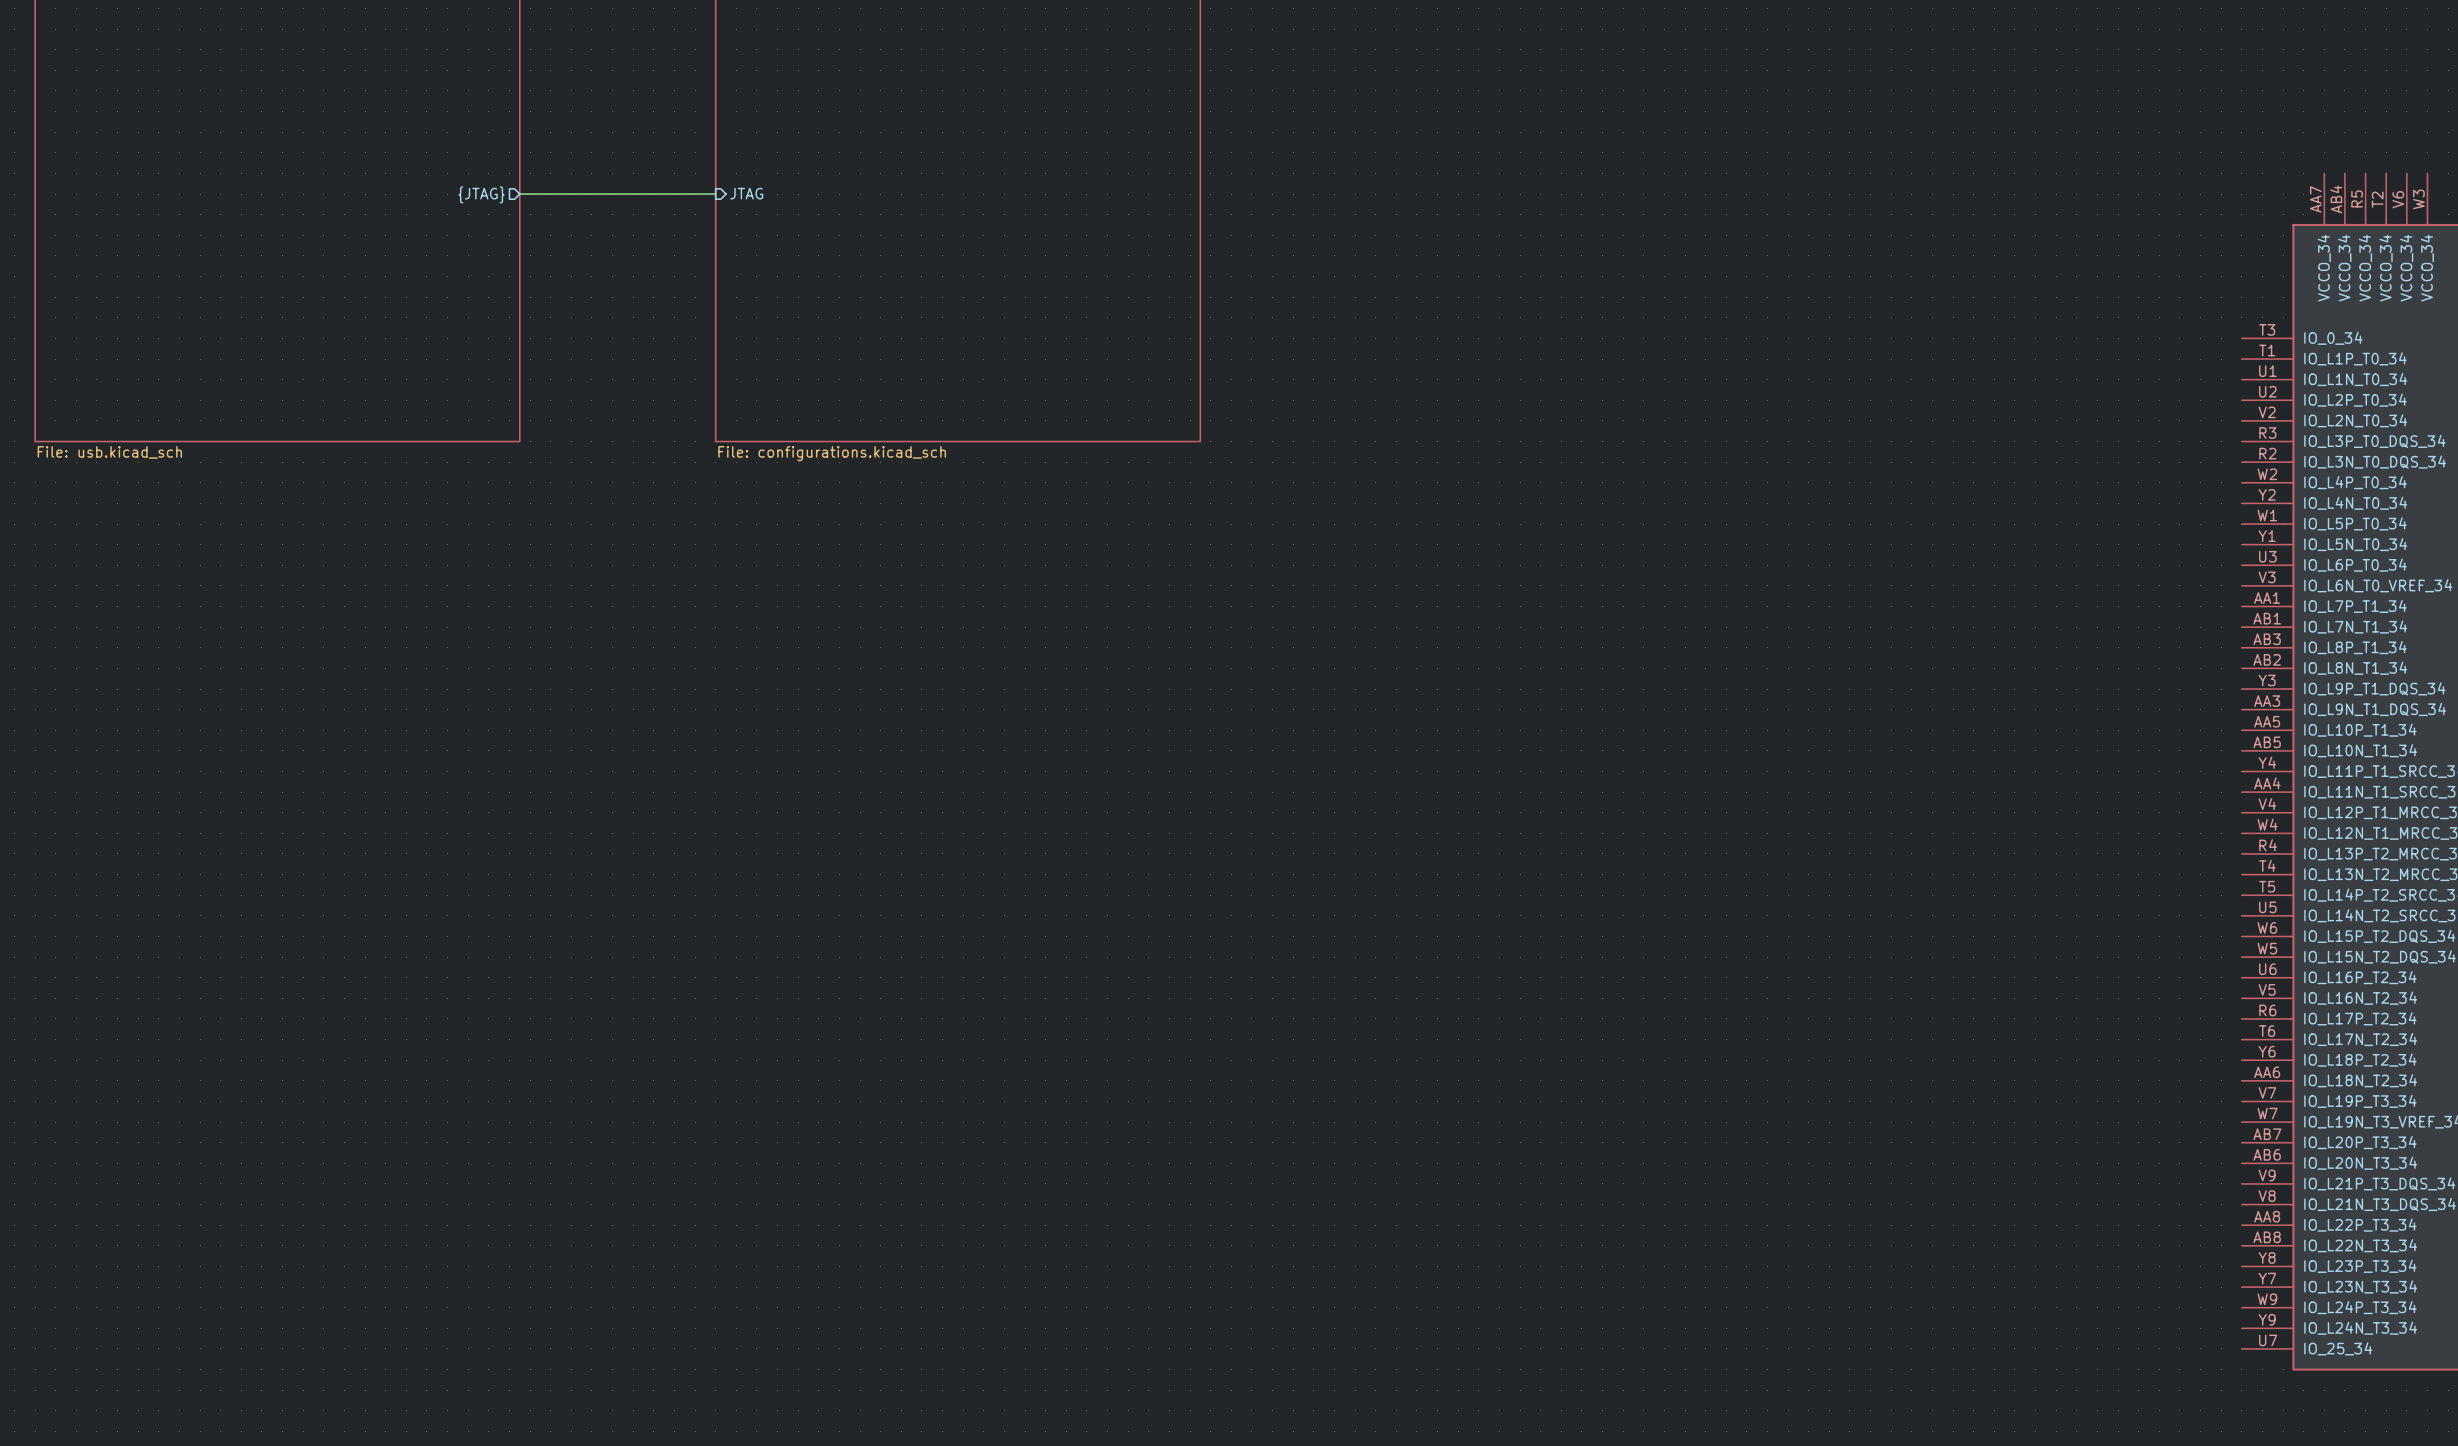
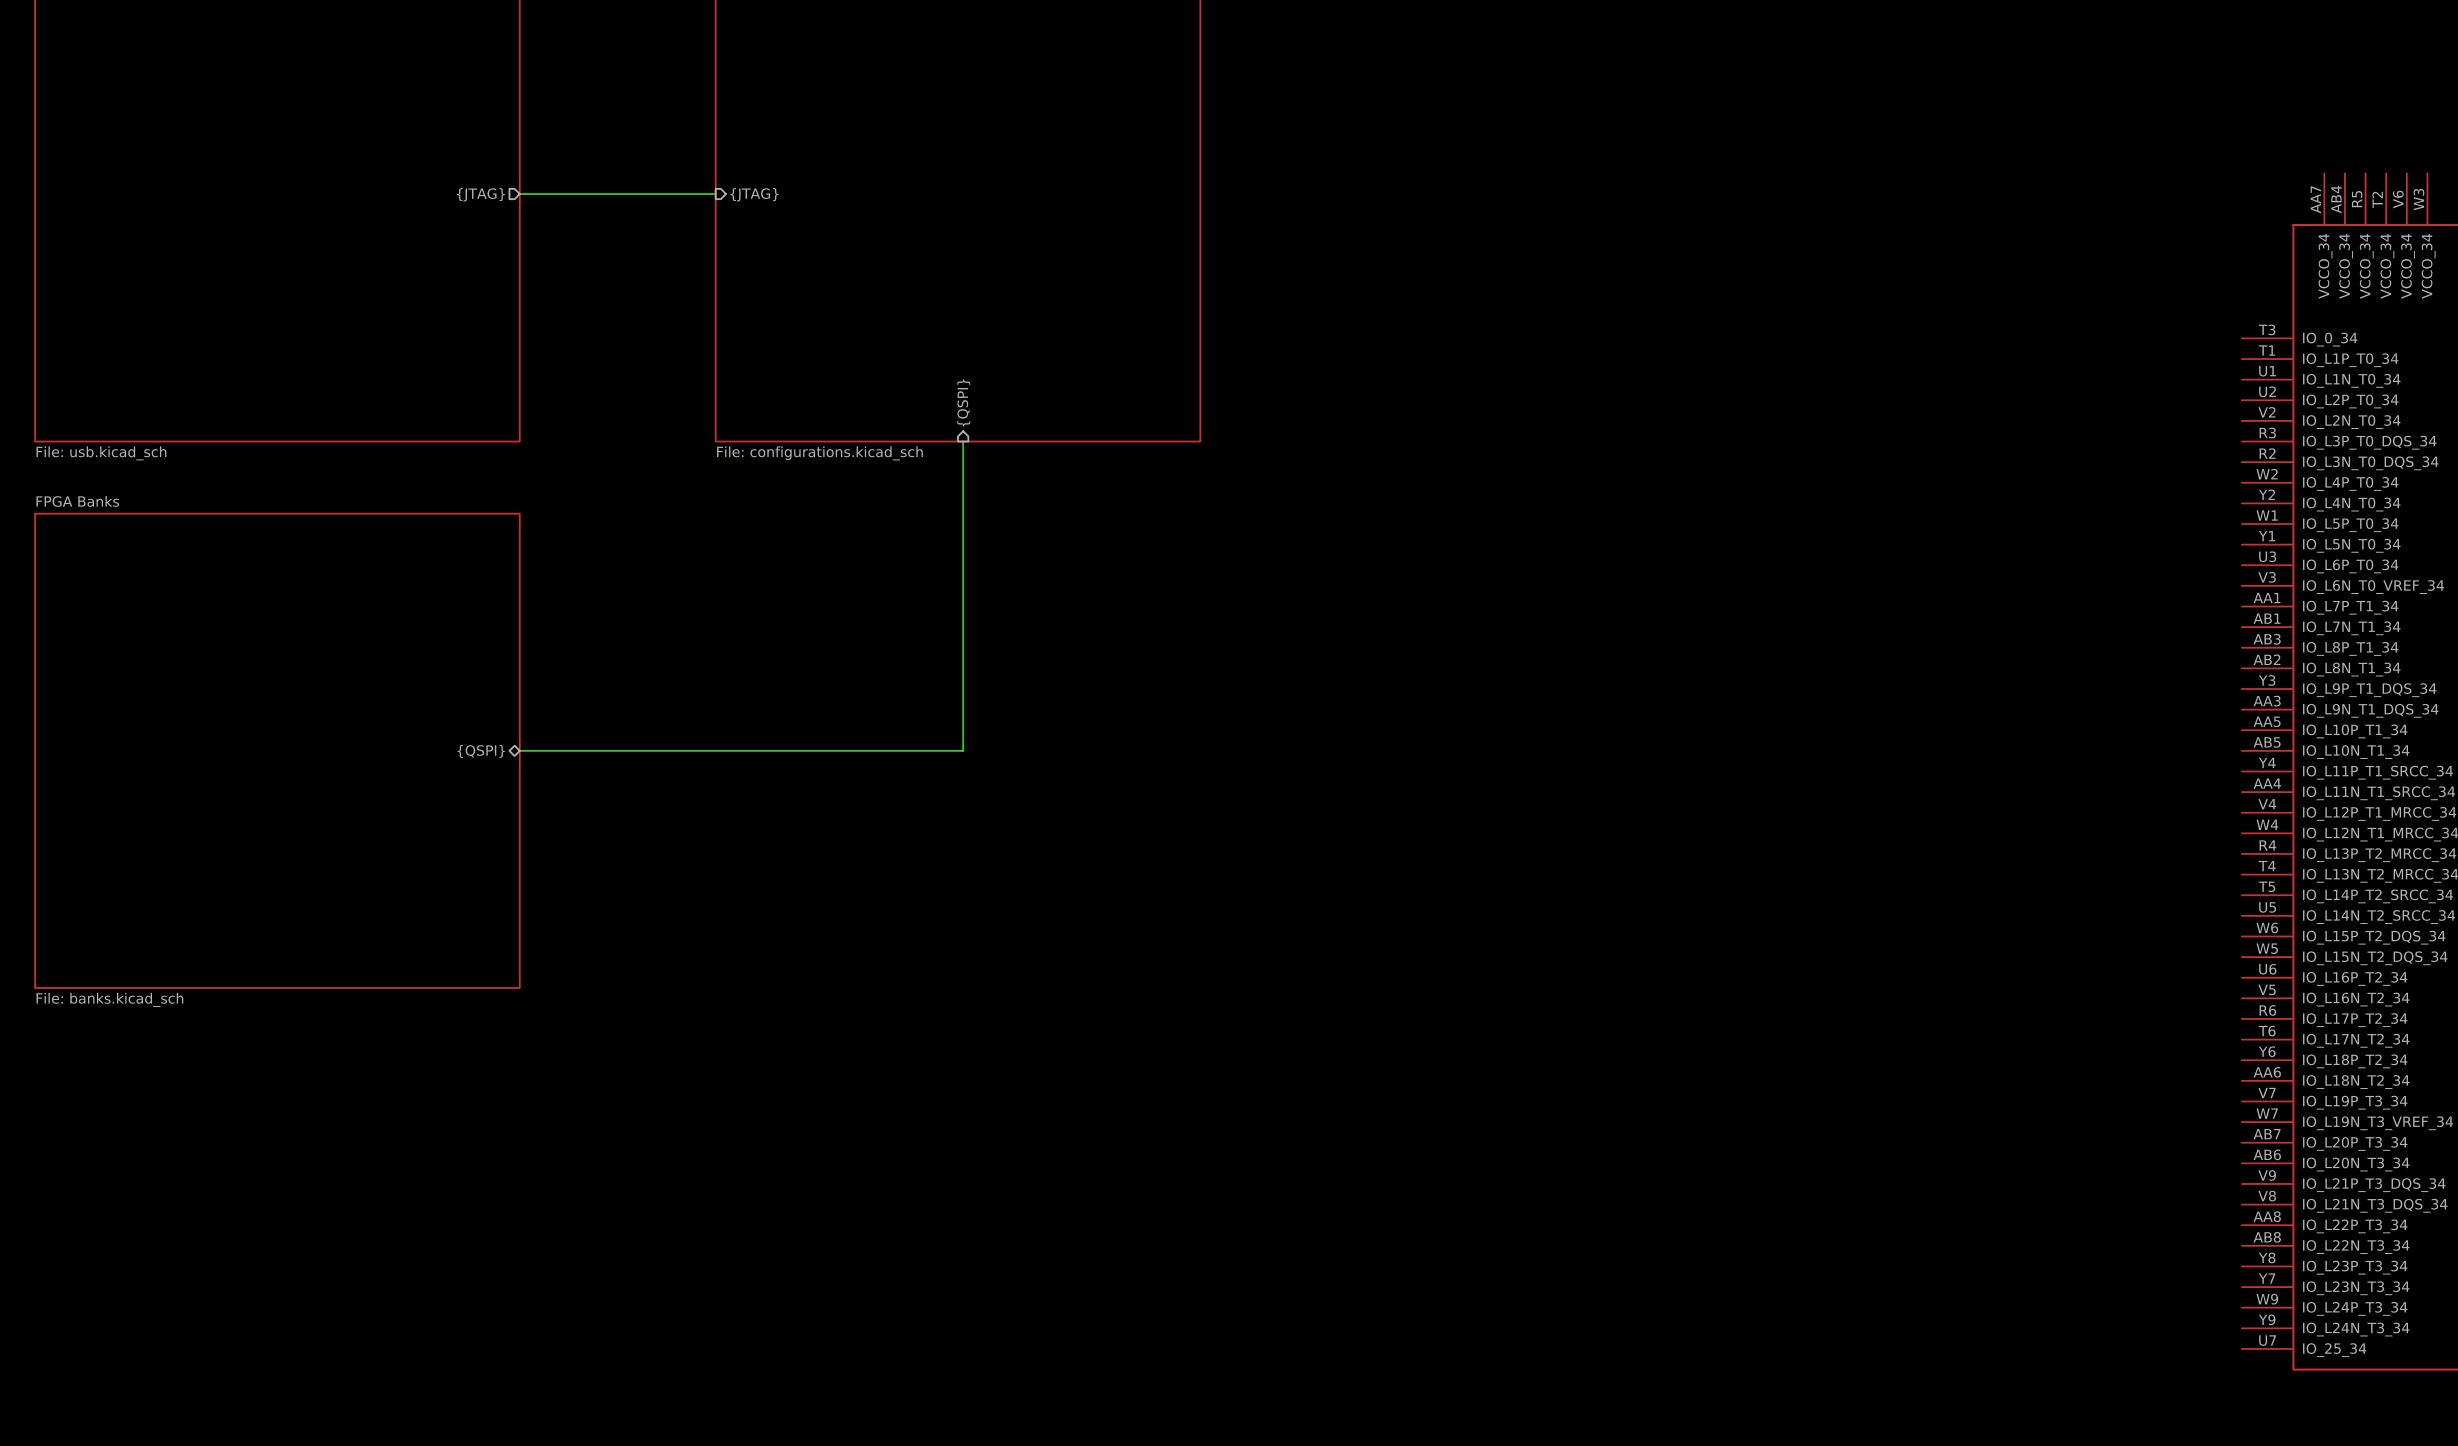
sheet pin: JTAG (746, 193) -> {JTAG} (754, 194)
sheet pin: none -> {QSPI} (963, 403)
wire: none -> (963, 441) (963, 750) (519, 750)
sheet FPGA Banks: none -> File: banks.kicad_sch (277, 750)
sheet pin: none -> {QSPI} (481, 751)

